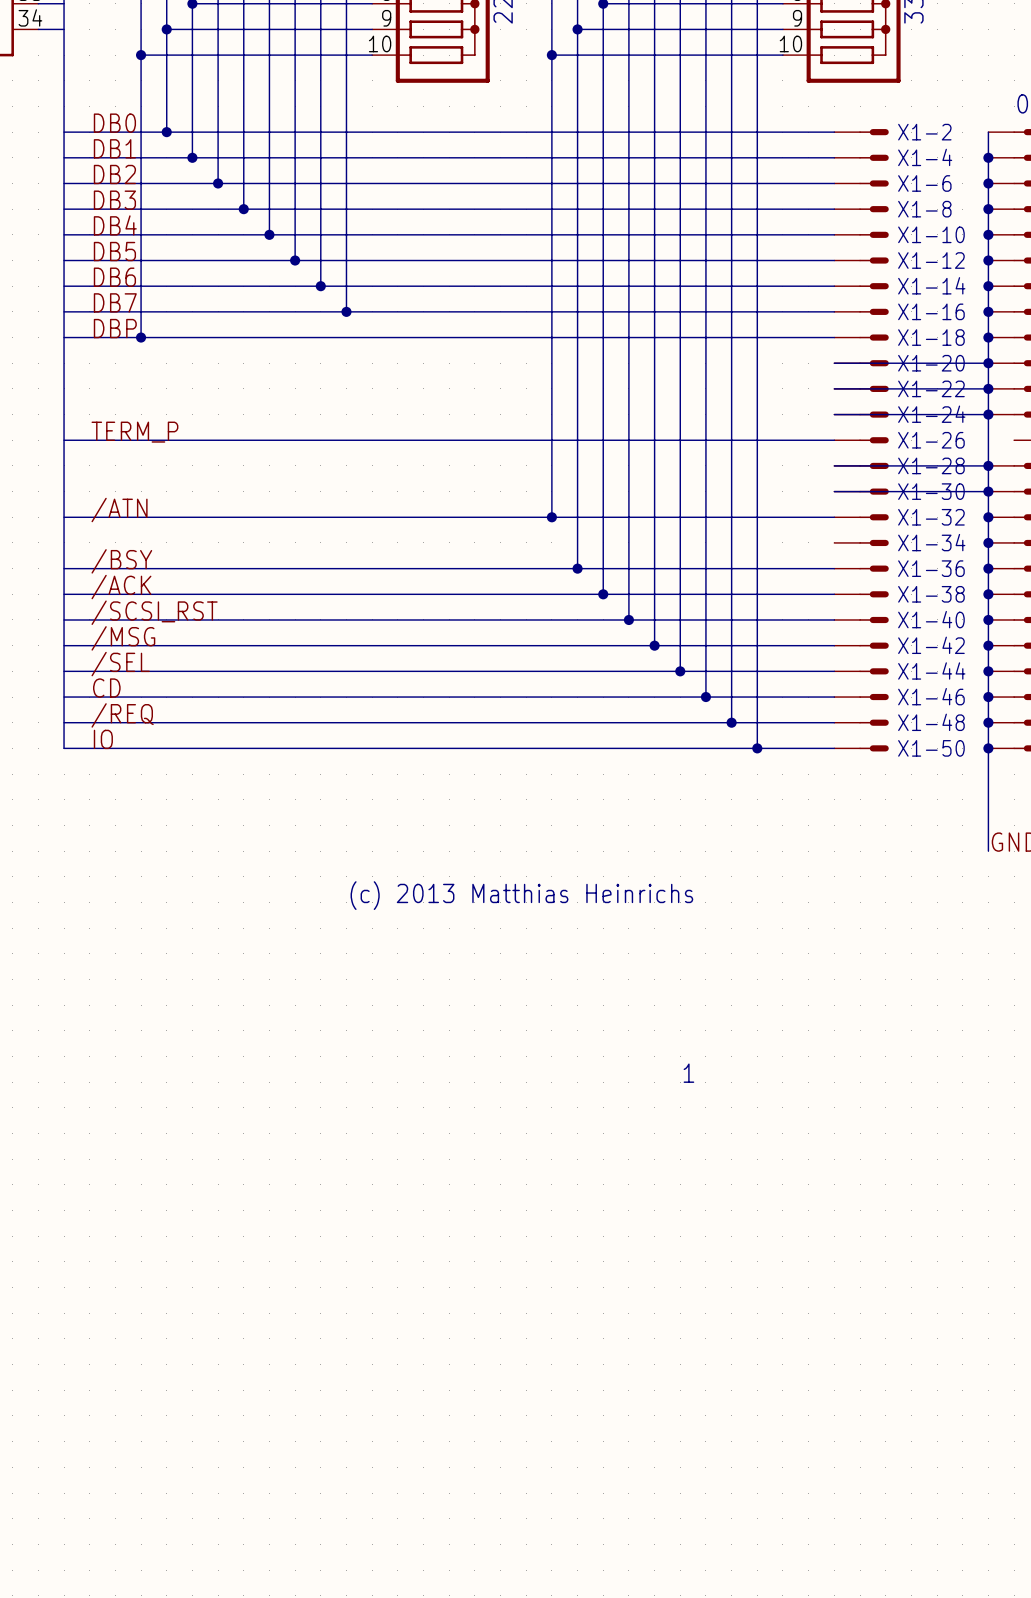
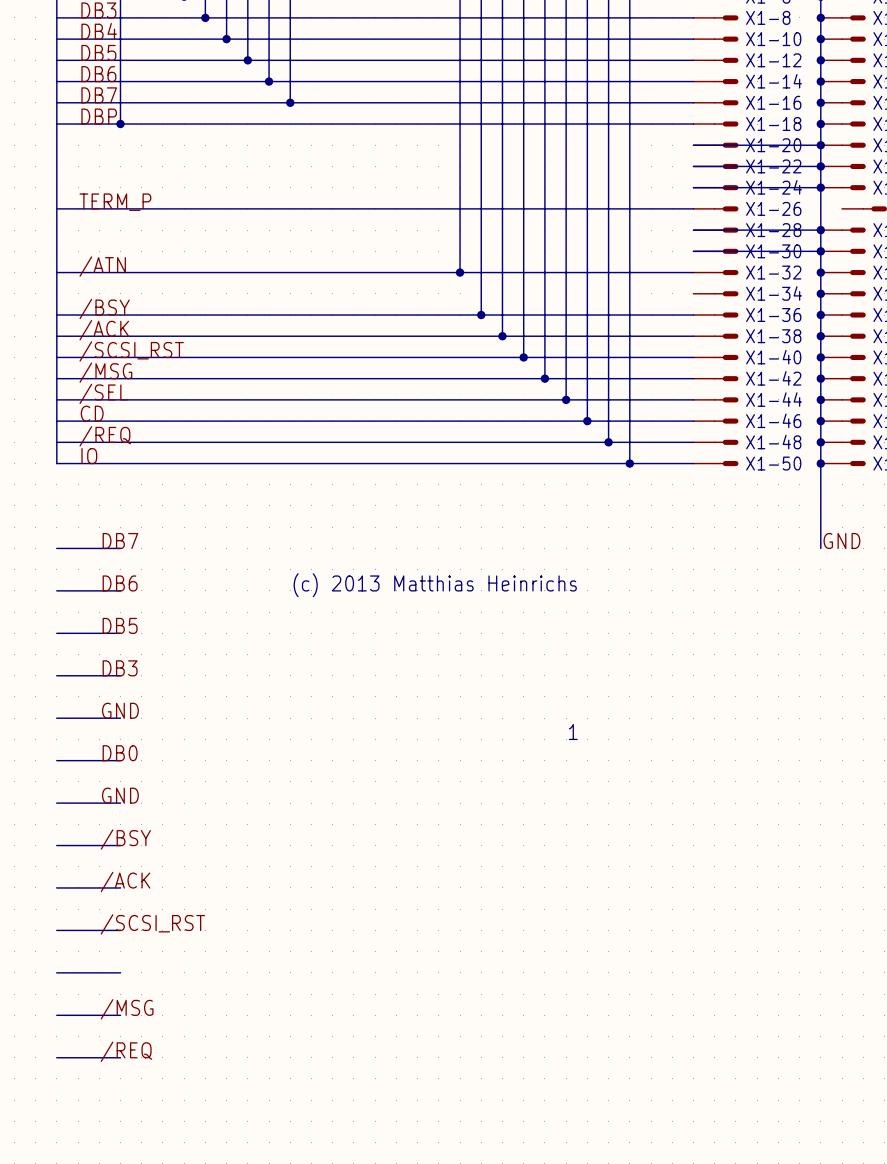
label: none -> DB7 (120, 541)
wire: none -> (56, 548) (120, 548)
label: none -> DB6 (120, 583)
wire: none -> (56, 590) (120, 590)
label: none -> DB5 (120, 625)
wire: none -> (56, 633) (120, 633)
label: none -> DB3 (120, 668)
wire: none -> (56, 675) (120, 675)
label: none -> GND (120, 710)
wire: none -> (56, 718) (120, 718)
label: none -> DB0 (120, 753)
wire: none -> (56, 760) (120, 760)
label: none -> GND (120, 795)
wire: none -> (56, 803) (120, 803)
label: none -> /BSY (125, 839)
wire: none -> (56, 845) (120, 845)
label: none -> /ACK (125, 881)
wire: none -> (56, 887) (120, 887)
label: none -> /SCSI_RST (152, 924)
wire: none -> (56, 930) (120, 930)
wire: none -> (56, 972) (120, 972)
label: none -> /MSG (127, 1009)
wire: none -> (56, 1015) (120, 1015)
label: none -> /REQ (126, 1051)
wire: none -> (56, 1057) (120, 1057)

